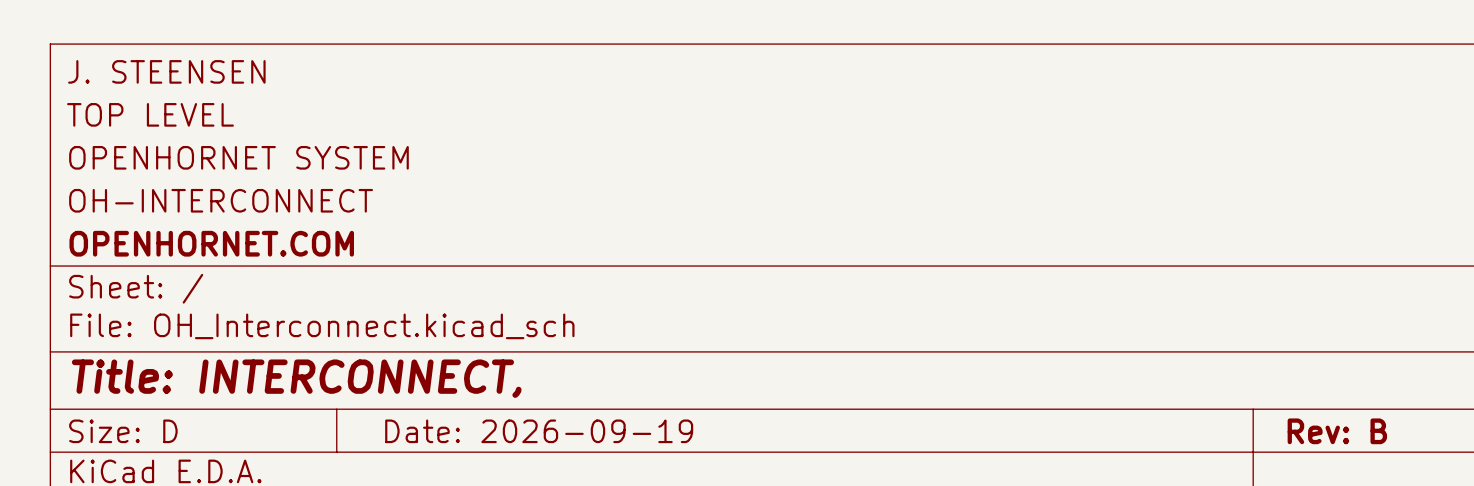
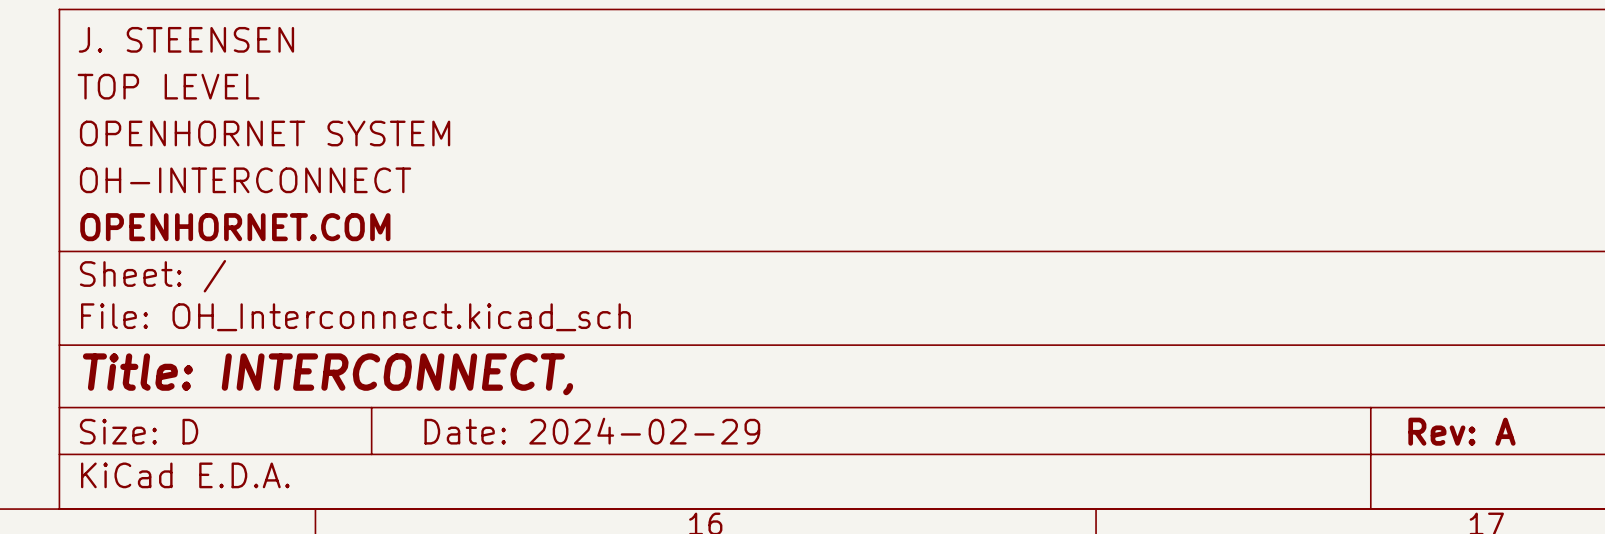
title block: Date: 2026-09-19 (539, 431) -> Date: 2024-02-29 (592, 431)
title block: Rev: B (1337, 431) -> Rev: A (1461, 431)

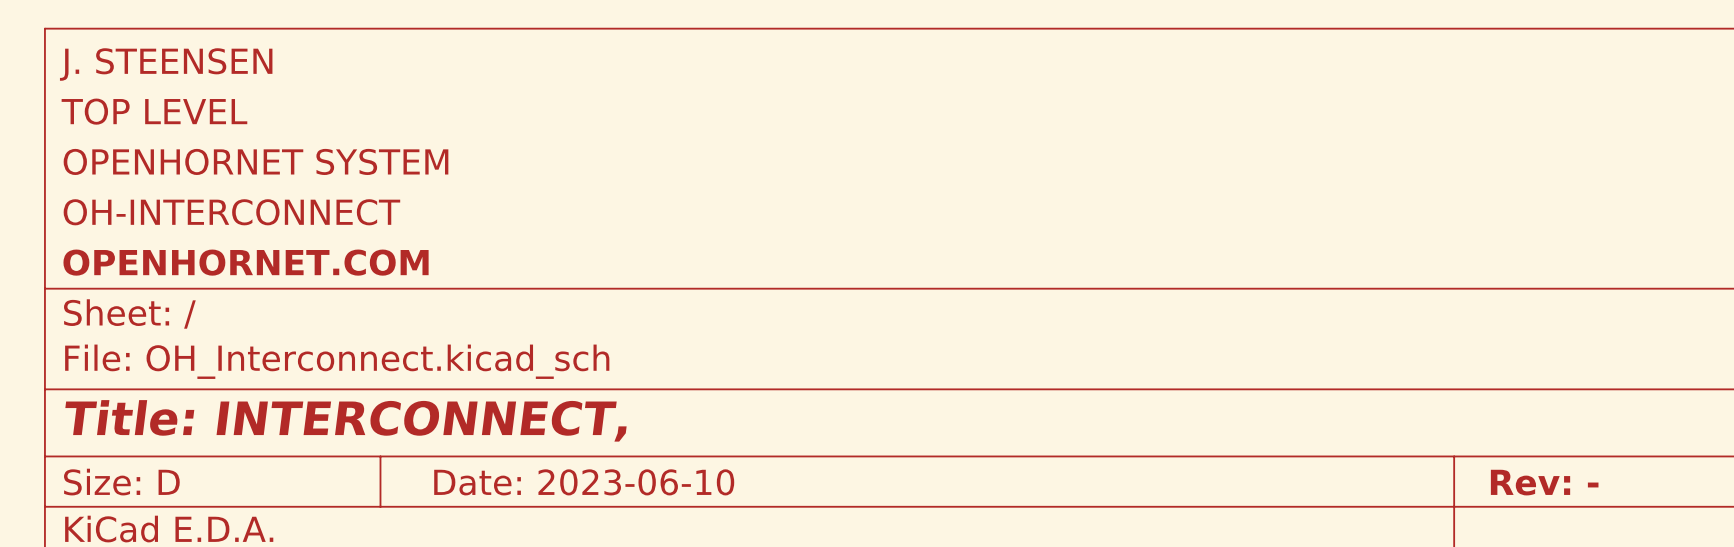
title block: Date: 2024-02-29 (592, 431) -> Date: 2023-06-10 (584, 482)
title block: Rev: A (1461, 431) -> Rev: - (1544, 482)

